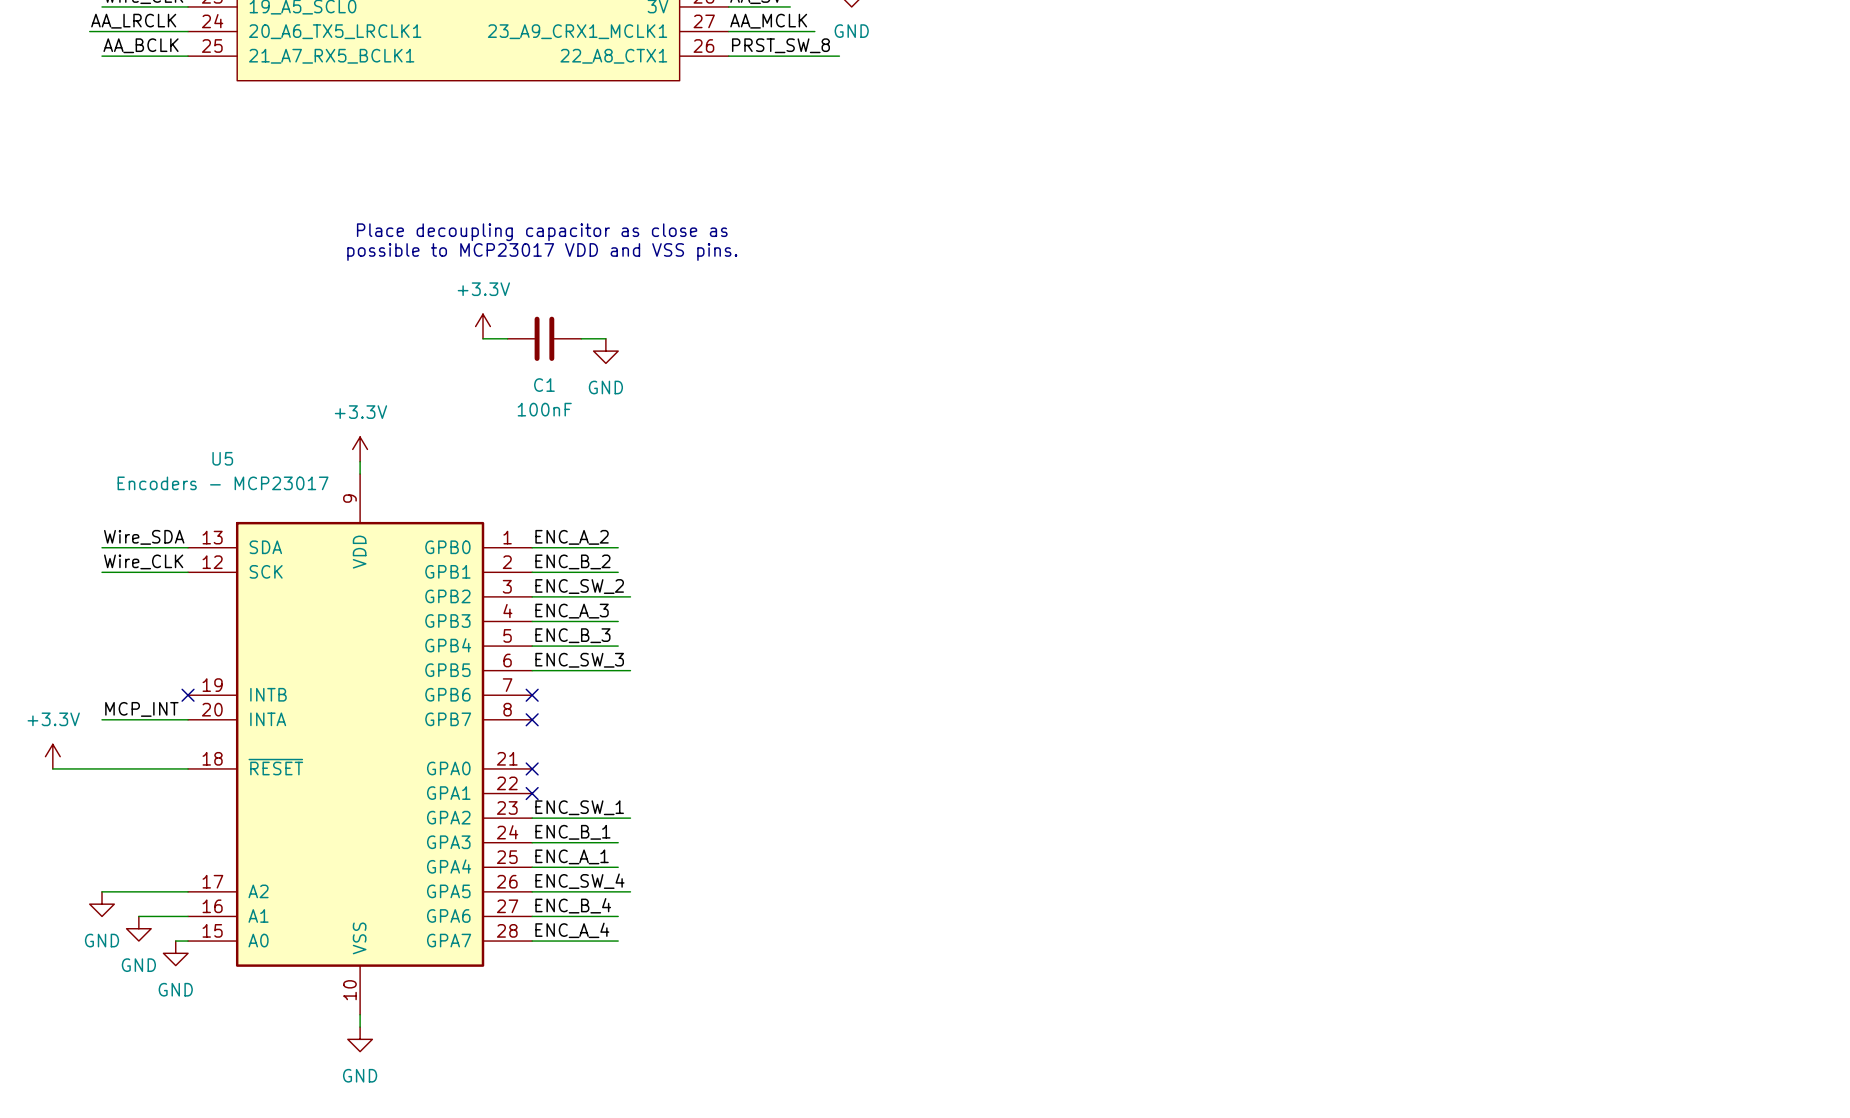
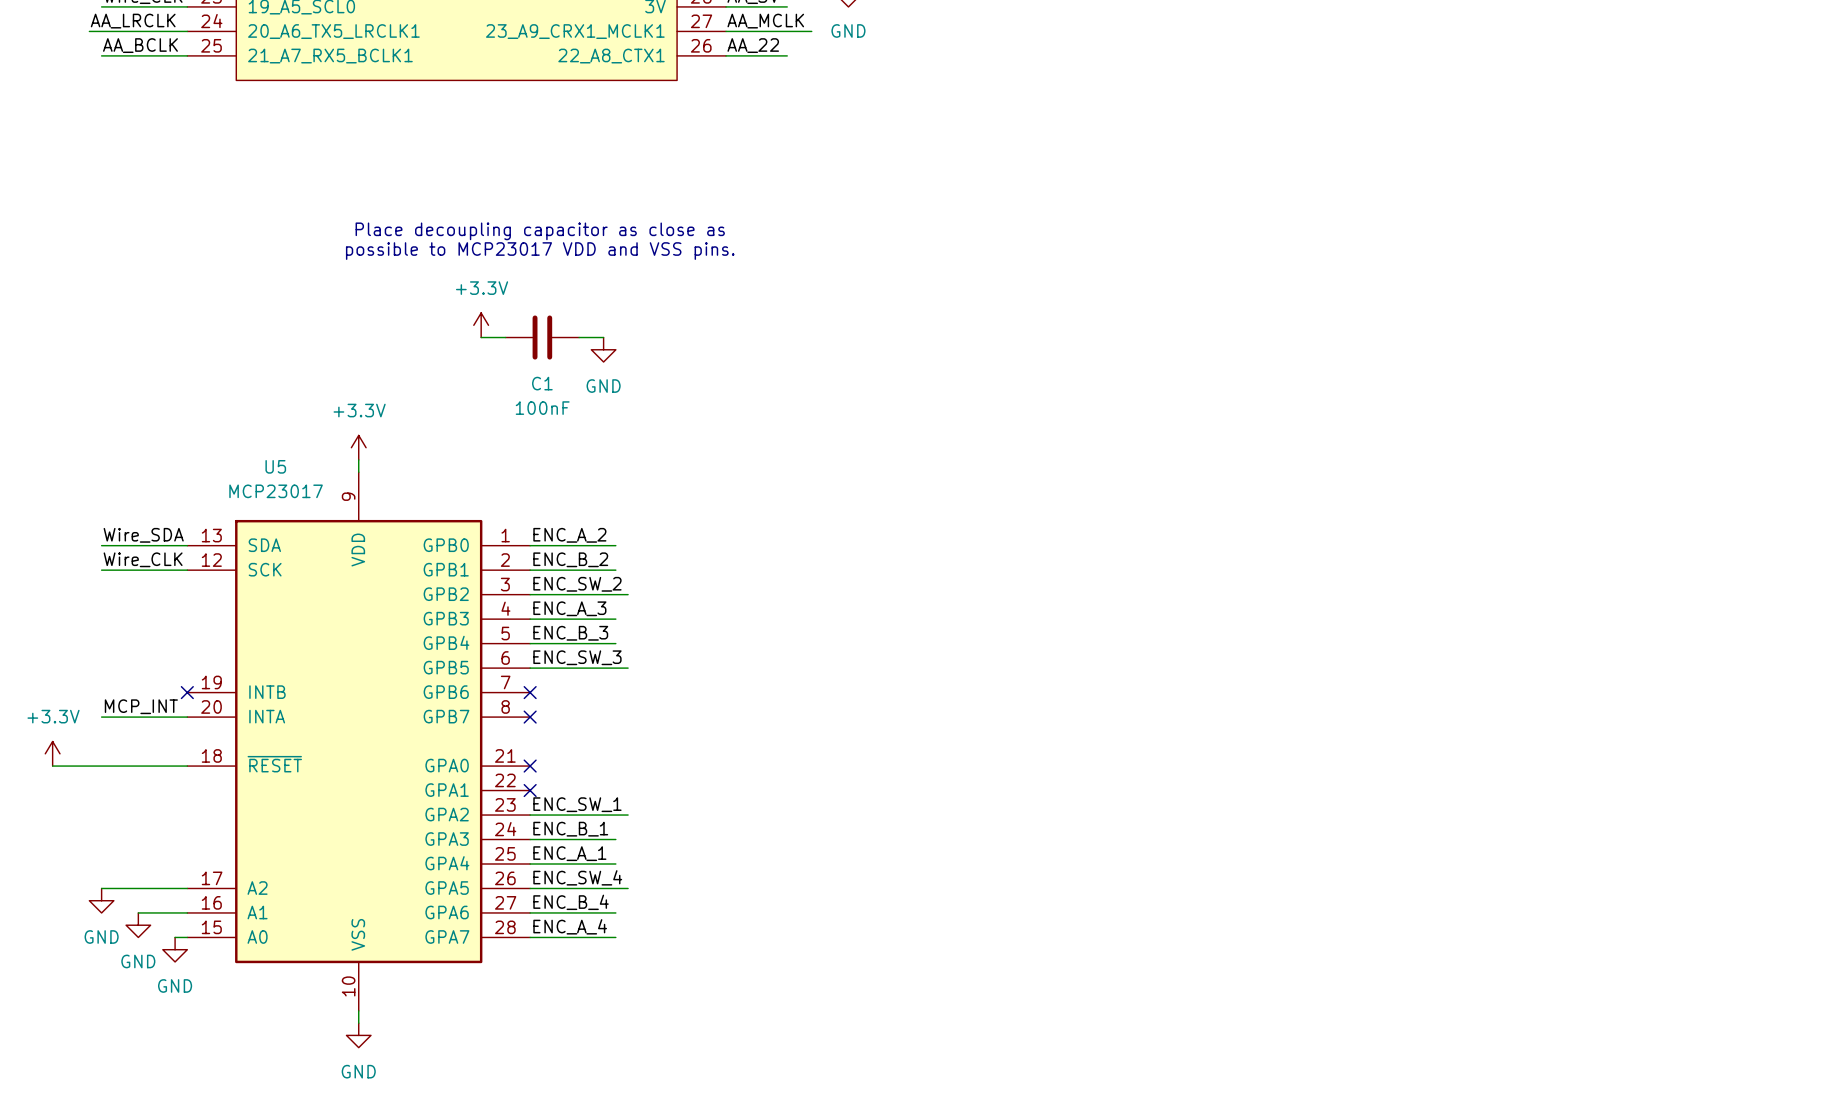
label: PRST_SW_8 (780, 45) -> AA_22 (753, 45)
wire: (790, 56) (839, 56) -> none
U5 name position: U5 (222, 458) -> U5 (275, 466)
U5 value: Encoders - MCP23017 (223, 483) -> MCP23017 (276, 491)

